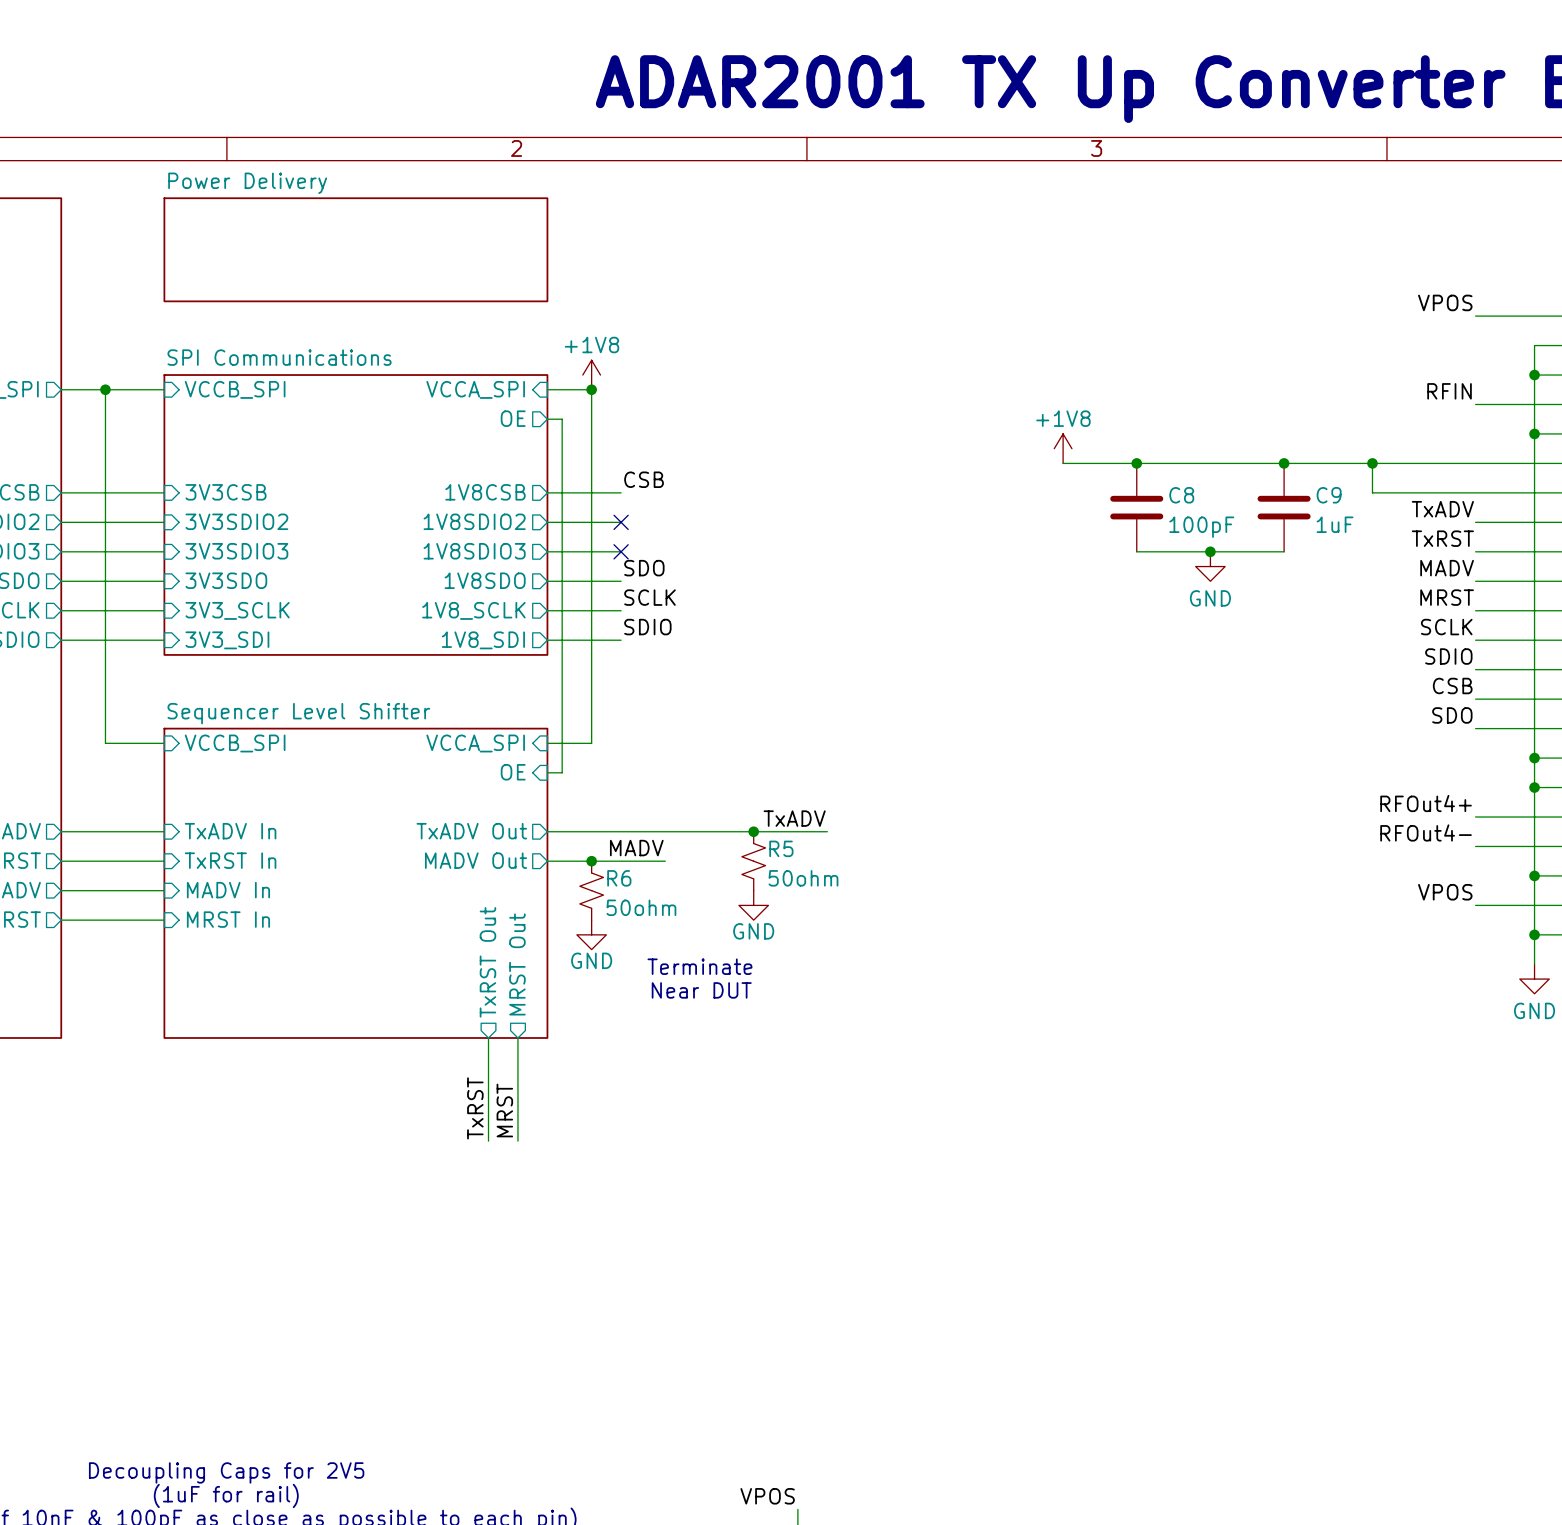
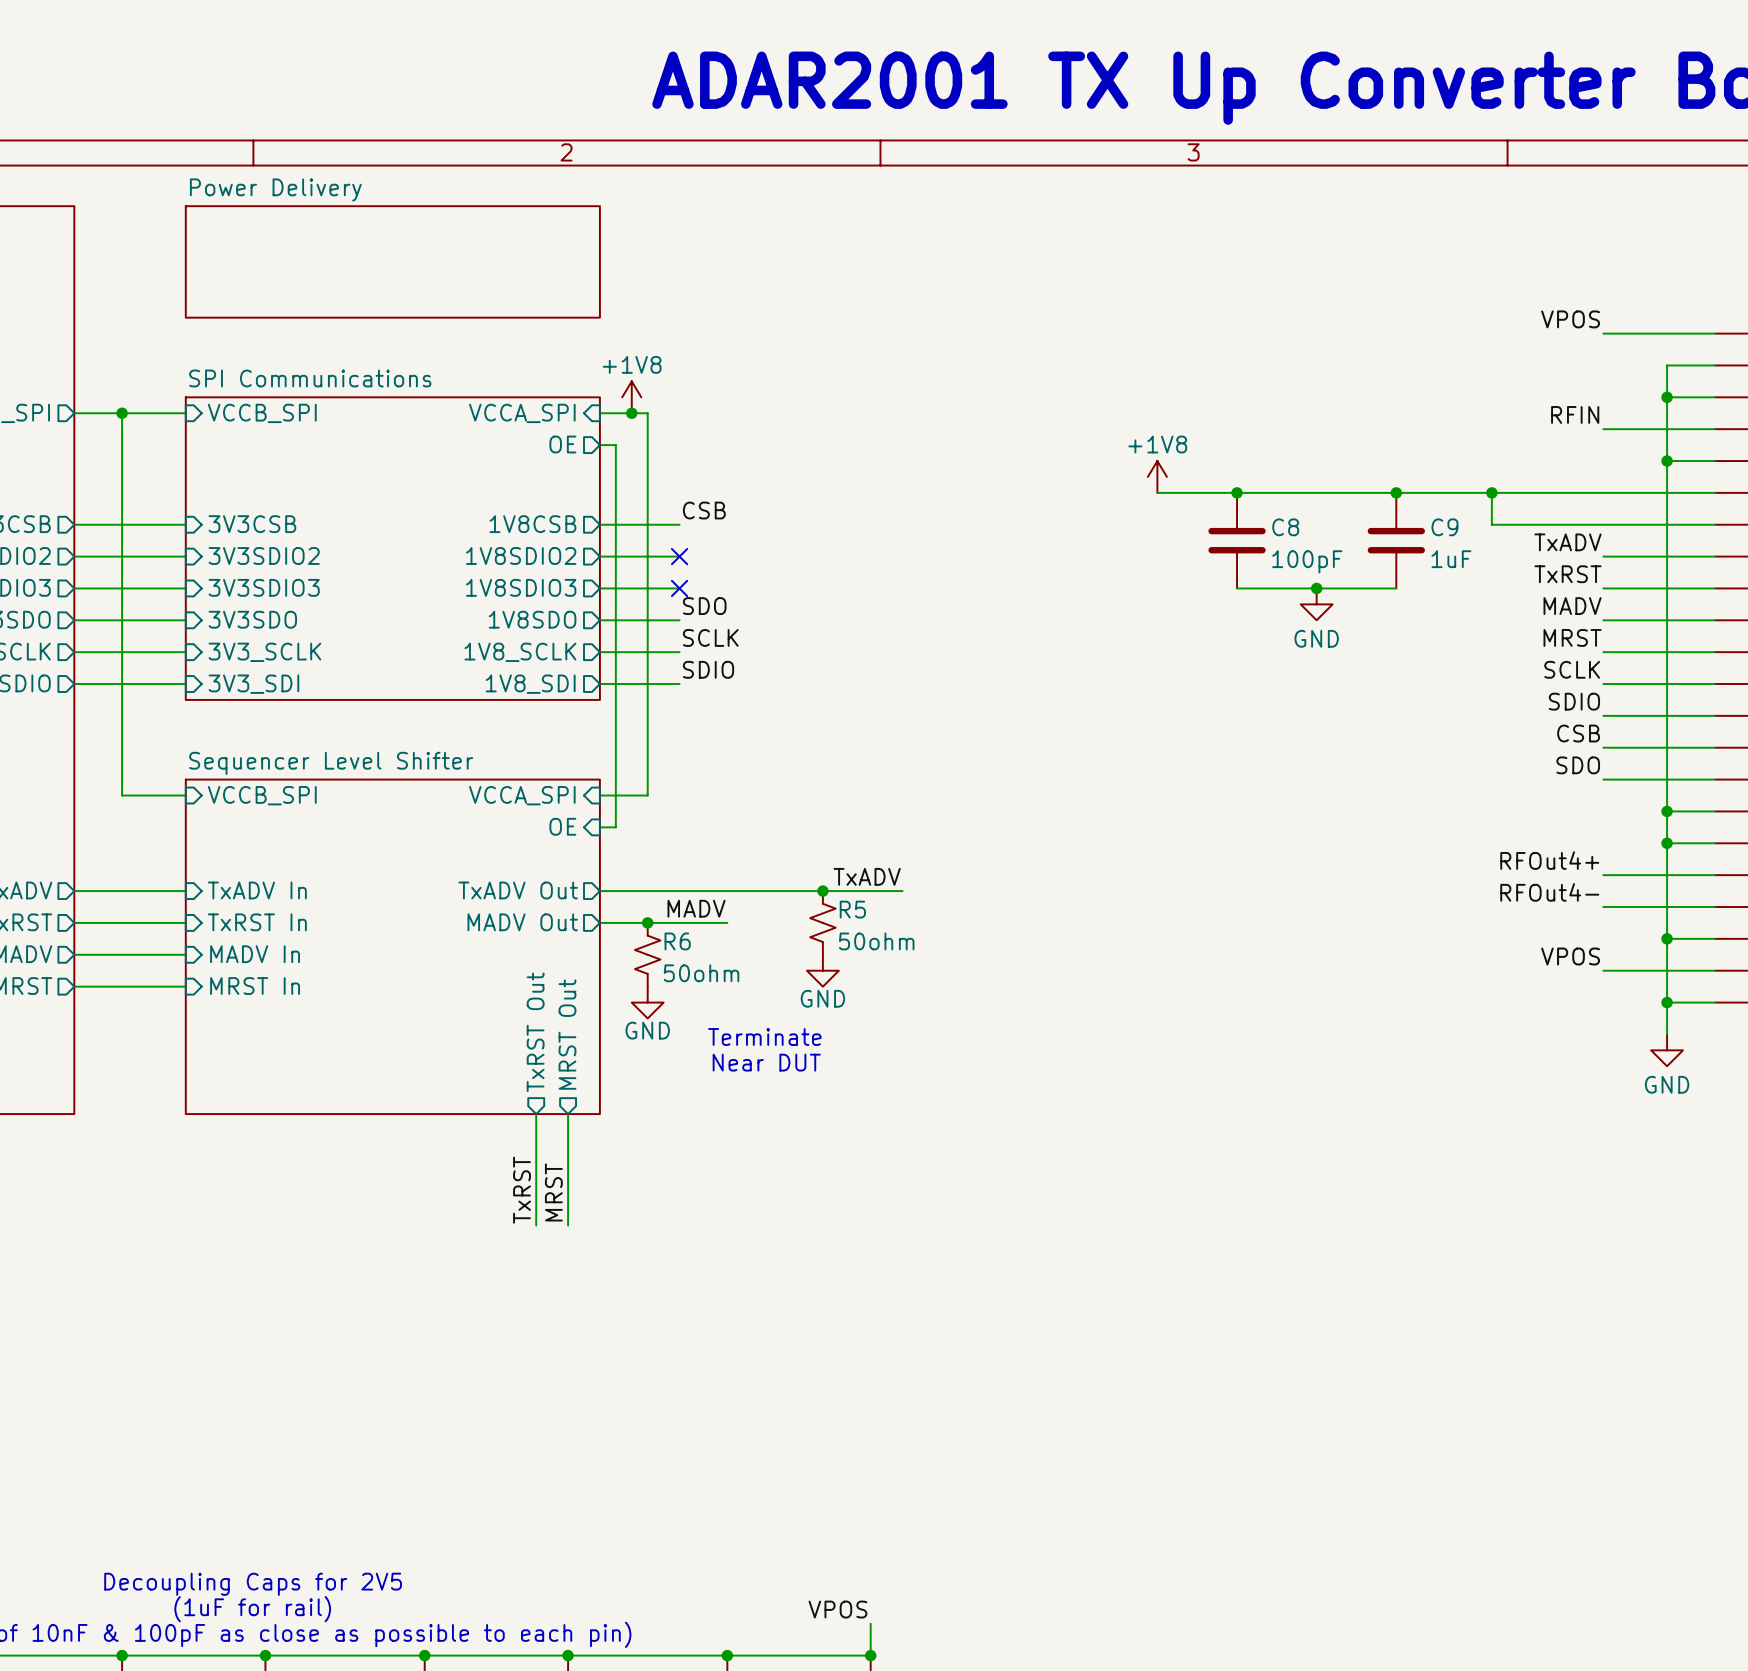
power symbol position: +1V8 (591, 375) -> +1V8 (631, 397)
junction position: (591, 389) -> (631, 413)

